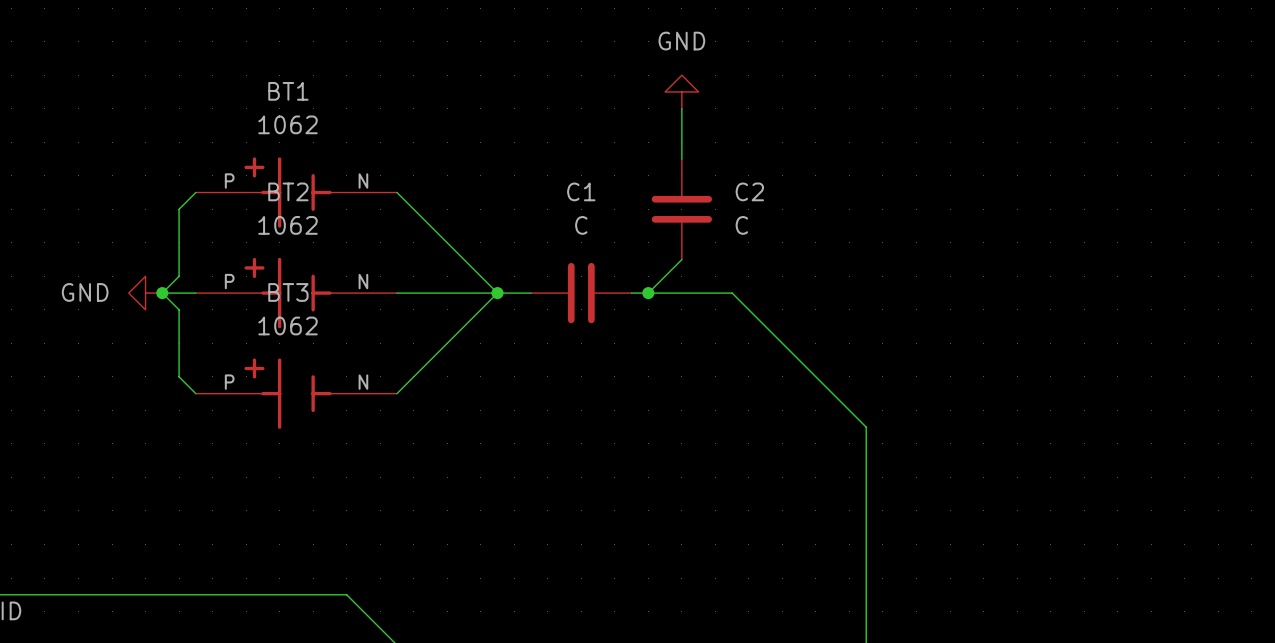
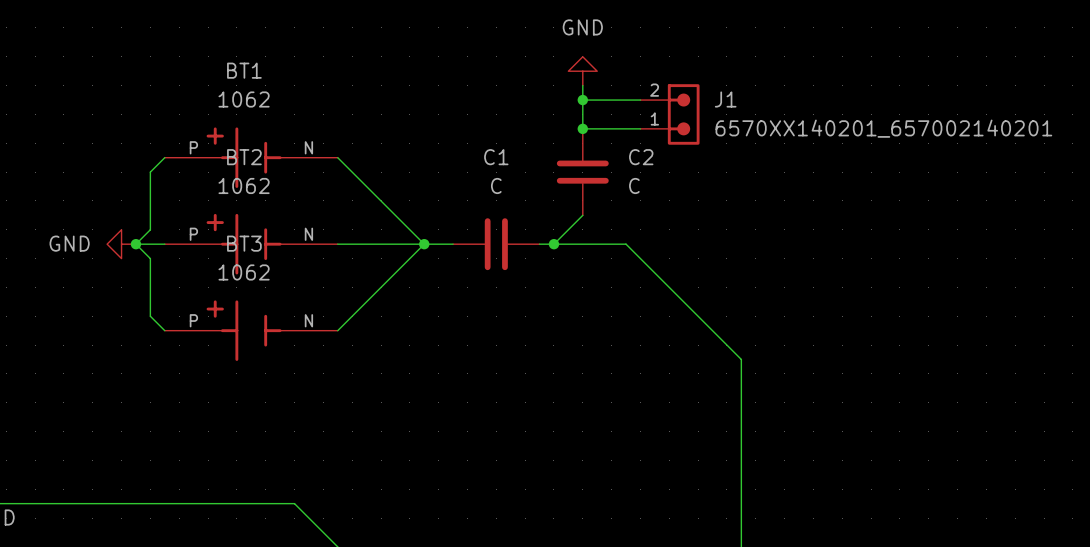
wire: none -> (582, 100) (640, 100)
junction: none -> (582, 100)
J1: none -> 6570XX140201_657002140201 (670, 114)
wire: none -> (582, 128) (640, 128)
junction: none -> (582, 128)

